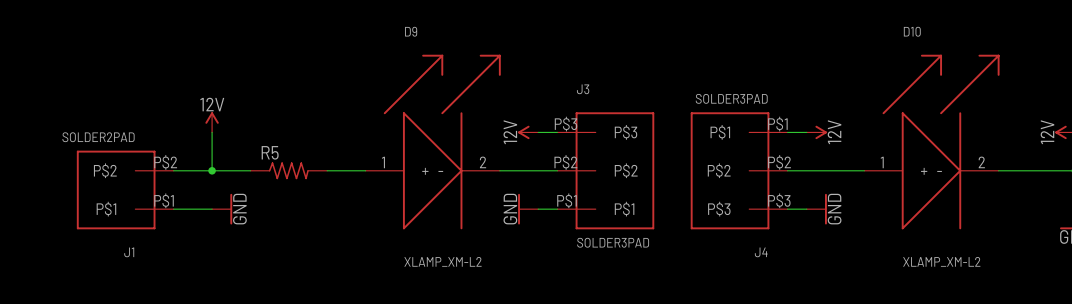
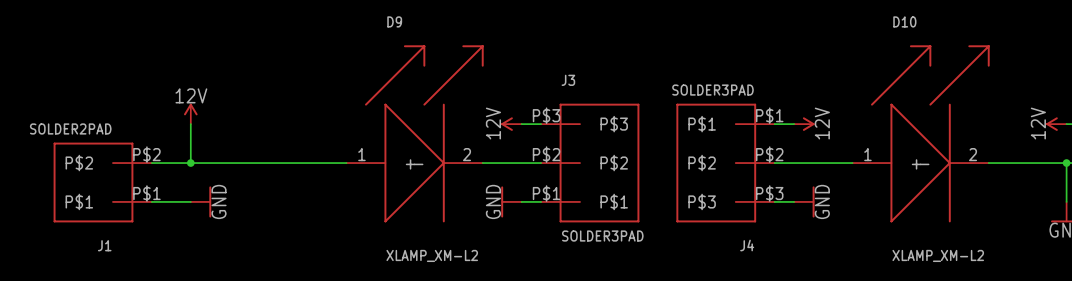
R5: (288, 170) -> none

